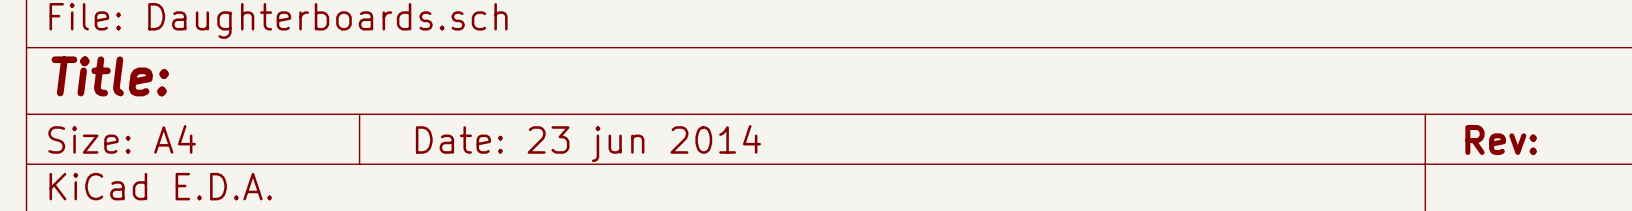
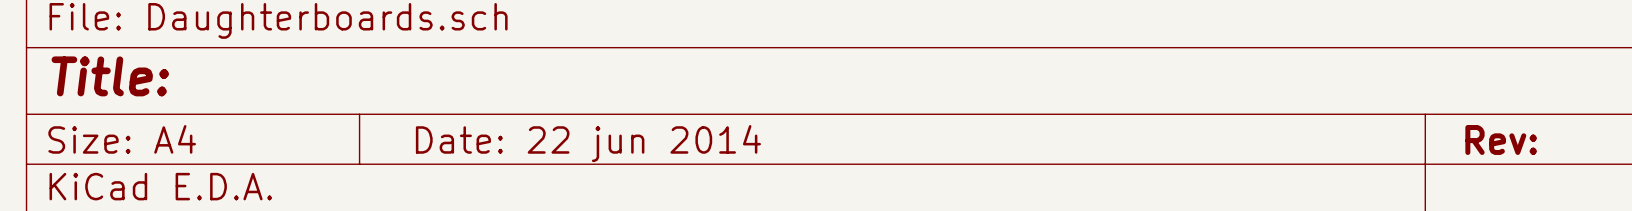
title block: Date: 23 jun 2014 (588, 143) -> Date: 22 jun 2014 (588, 143)

